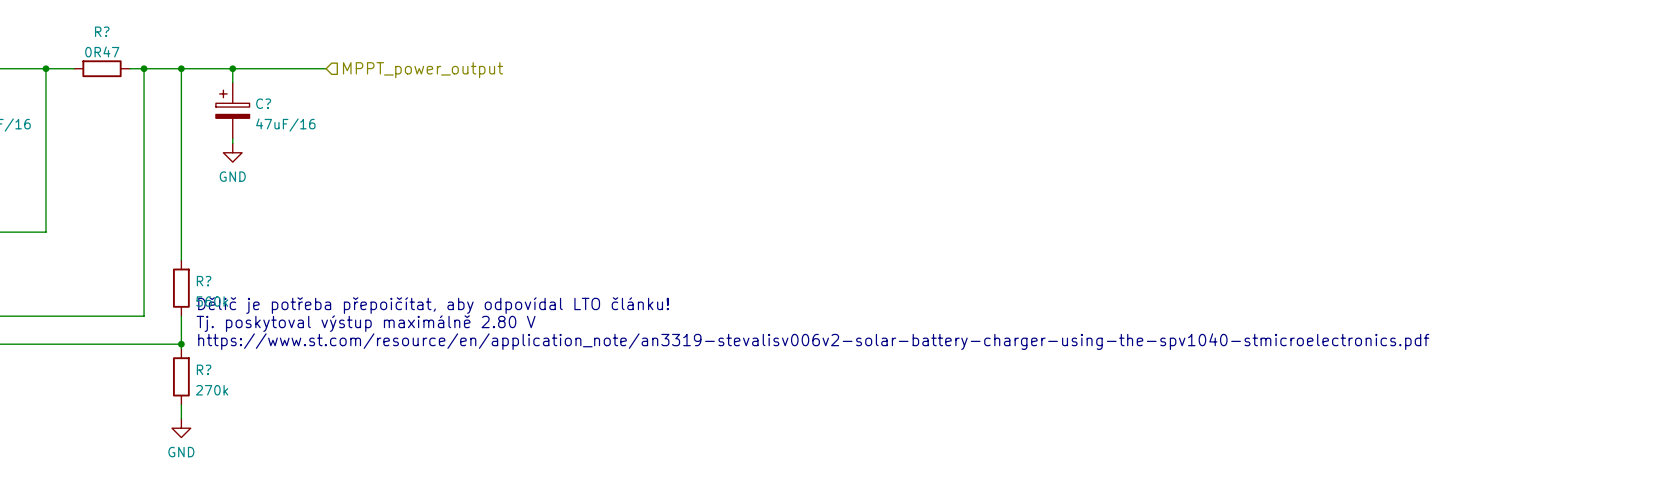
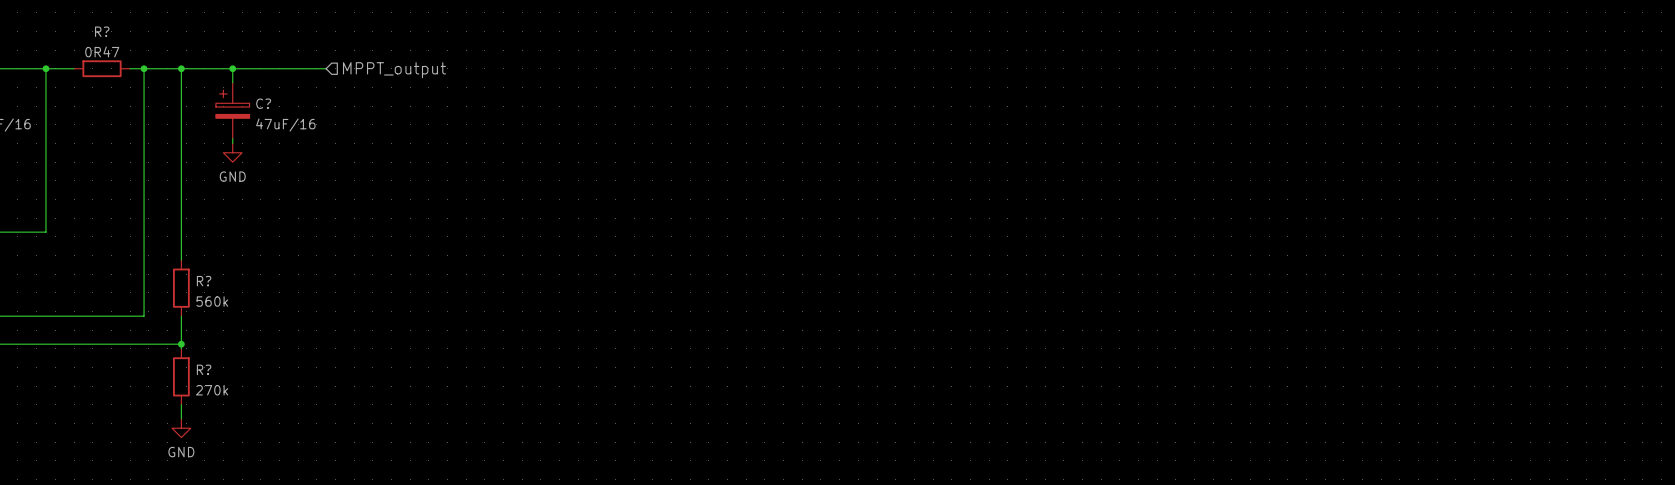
hierarchical label: MPPT_power_output (423, 70) -> MPPT_output (394, 70)
text: Dělič je potřeba přepoičítat, aby odpovídal LTO článku! (433, 305) -> none
text: Tj. poskytoval výstup maximálně 2.80 V (366, 323) -> none
text: https://www.st.com/resource/en/application_note/an3319-stevalisv006v2-solar-battery-charger-using-the-spv1040-stmicroelectronics.pdf (813, 341) -> none

